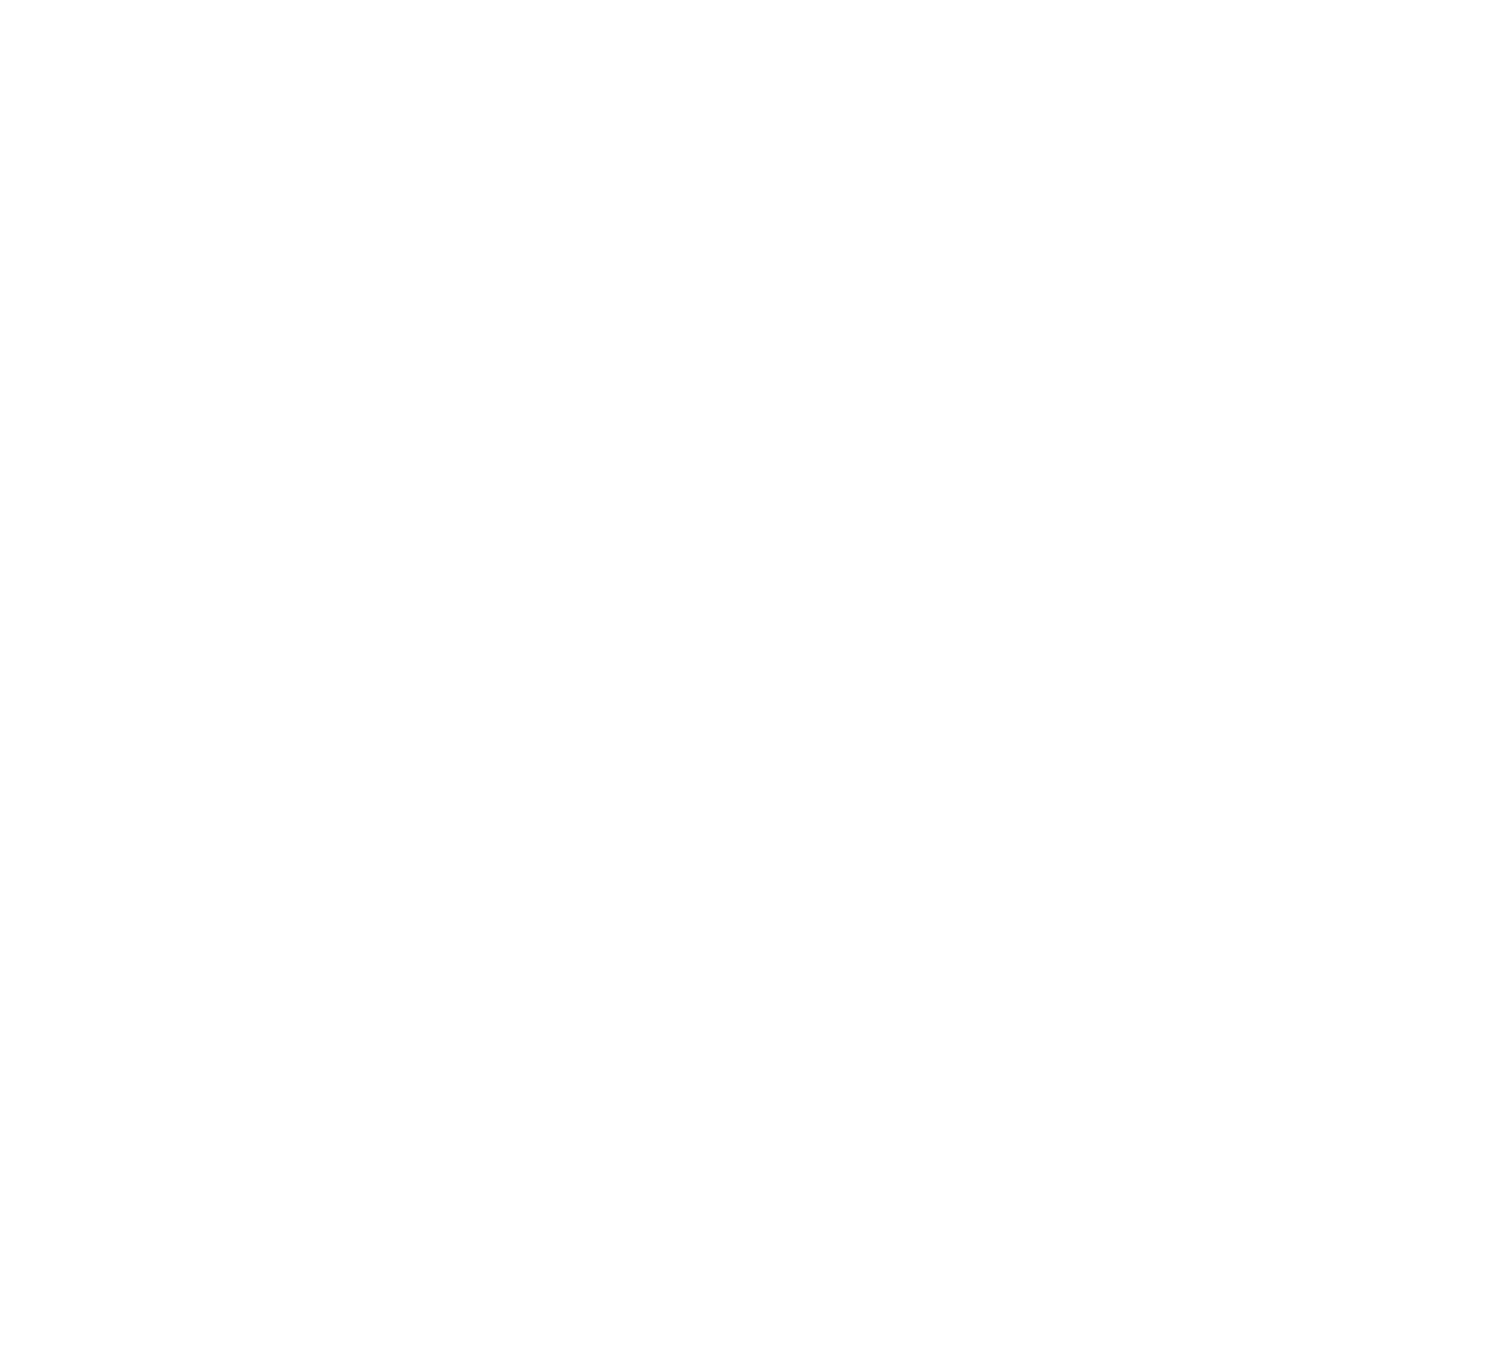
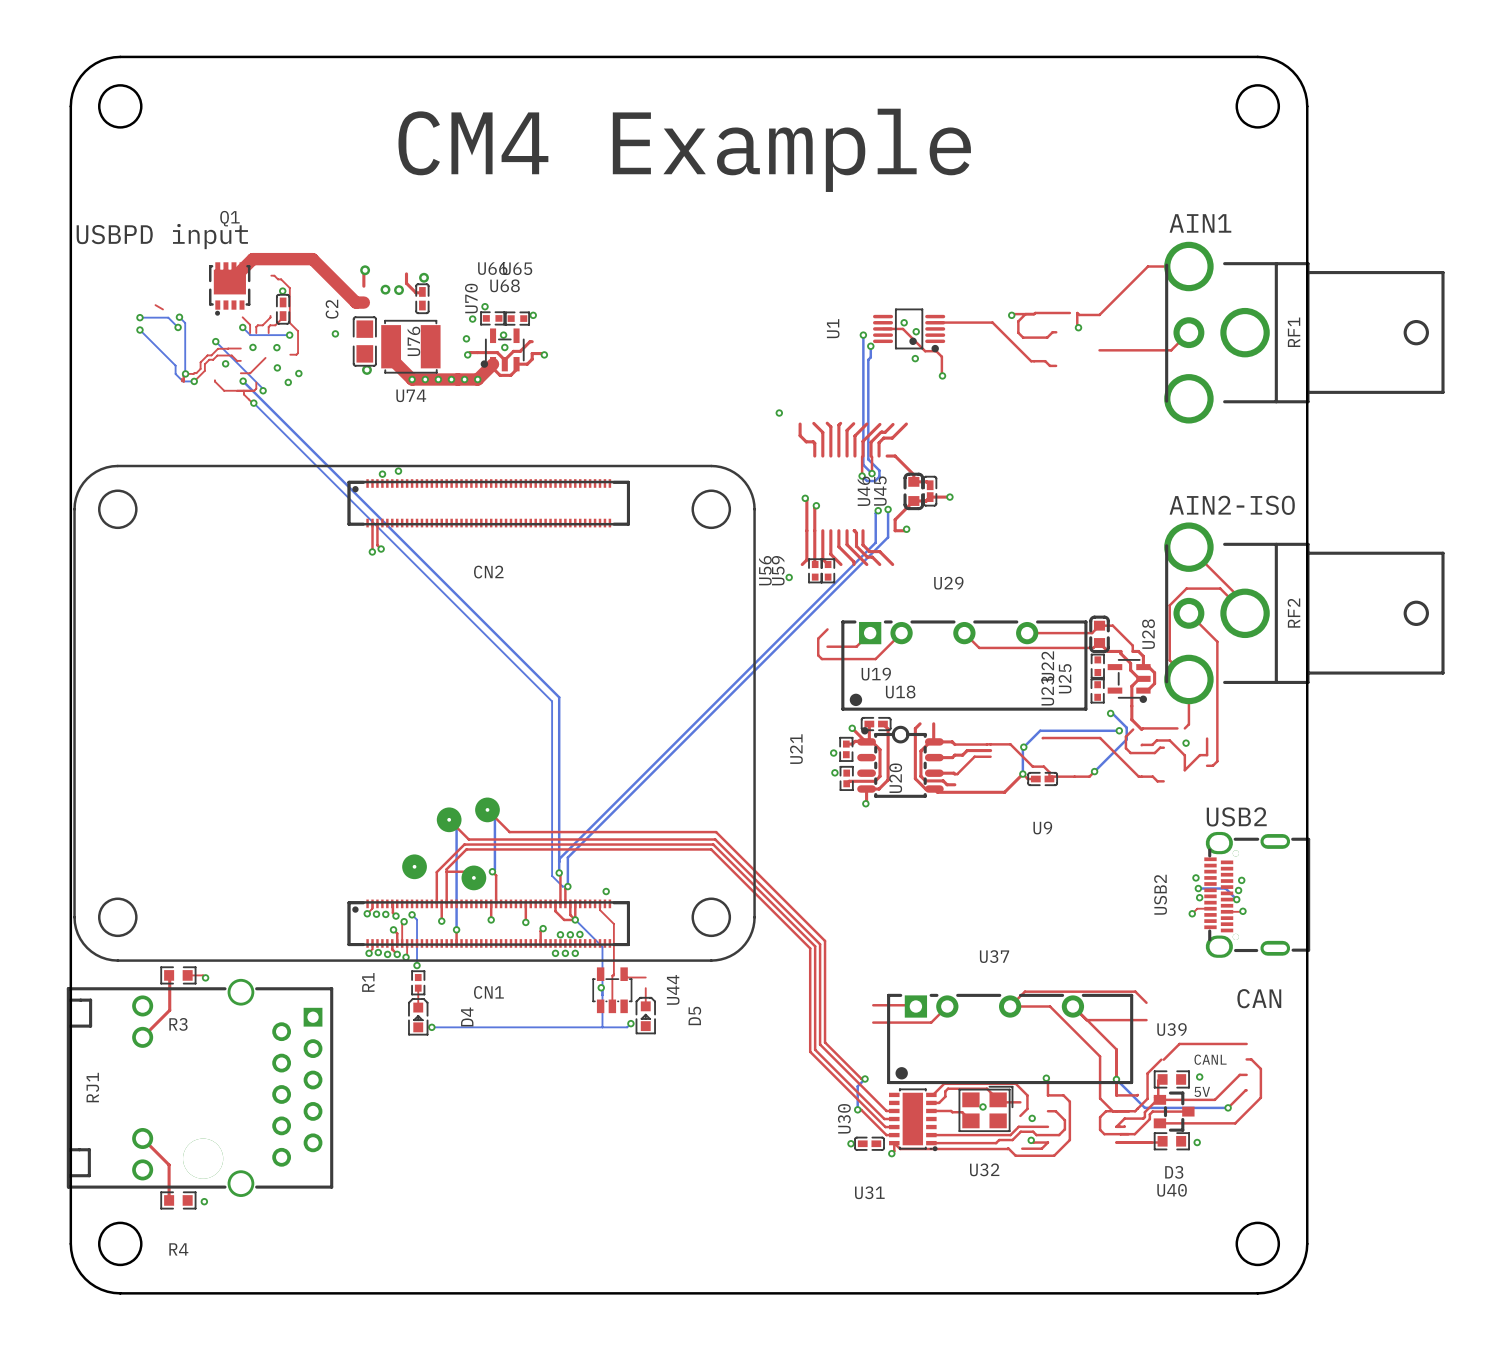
board edge: none -> (120, 56) (1257, 56) (1276, 60) (1292, 71) (1303, 87) (1307, 106) (1307, 1243) (1303, 1262) (1292, 1278) (1276, 1289) (1257, 1293) (120, 1293) (101, 1289) (85, 1278) (74, 1262) (70, 1243) (70, 106) (74, 87) (85, 71) (101, 60) (120, 56)
round board edge: none -> [98, 84, 143, 129]
round board edge: none -> [1235, 84, 1281, 129]
text: none -> CM4 Example (684, 150)
text: none -> AIN1 (1200, 223)
text: none -> USBPD input (162, 236)
top track: none -> (1188, 266) (1147, 266) (1099, 314) (1079, 314) (1077, 312) (1078, 327)
top track: none -> (365, 270) (363, 286)
via: none -> (365, 270)
top track: none -> (406, 273) (406, 283) (415, 292) (422, 292)
top track: none -> (271, 275) (281, 279) (289, 288) (289, 322) (298, 331) (298, 353) (290, 354)
via: none -> (424, 277)
top track: none -> (229, 282) (252, 259) (312, 259) (356, 302) (363, 302)
Q1: none -> (229, 288)
via: none -> (385, 289)
via: none -> (399, 290)
via: none -> (282, 291)
U70: none -> (422, 298)
top track: none -> (155, 305) (162, 309)
via: none -> (485, 306)
C2: none -> (283, 309)
top track: none -> (1069, 312) (1011, 315)
top track: none -> (1025, 314) (1018, 321) (1018, 332) (1023, 337) (1047, 337) (1052, 332) (1056, 332)
top track: none -> (270, 315) (262, 325) (256, 326) (256, 333)
via: none -> (533, 315)
via: none -> (1011, 315)
top track: none -> (283, 316) (275, 325) (268, 326) (268, 333)
bottom track: none -> (139, 317) (168, 317) (178, 327)
via: none -> (139, 317)
bottom track: none -> (179, 317) (185, 322) (185, 373)
via: none -> (179, 317)
top track: none -> (242, 317) (250, 324) (250, 333)
U66: none -> (492, 318)
U65: none -> (517, 318)
via: none -> (472, 319)
via: none -> (904, 322)
top track: none -> (935, 322) (992, 322) (1031, 361) (1045, 361) (1049, 365) (1056, 365)
via: none -> (178, 327)
bottom track: none -> (242, 327) (250, 335) (289, 335)
via: none -> (242, 327)
via: none -> (1078, 327)
top track: none -> (883, 328) (902, 328) (925, 351) (936, 351) (941, 356) (942, 375)
bottom track: none -> (139, 330) (175, 365) (175, 374) (183, 381) (194, 381)
via: none -> (139, 330)
U1: none -> (909, 330)
via: none -> (916, 331)
top track: none -> (1188, 332) (1171, 350) (1099, 350)
RF1: none -> (1304, 332)
via: none -> (335, 333)
via: none -> (289, 335)
via: none -> (503, 335)
bottom track: none -> (863, 335) (863, 464) (872, 473)
via: none -> (863, 335)
via: none -> (466, 338)
bottom track: none -> (215, 341) (263, 390)
via: none -> (215, 341)
U76: none -> (364, 341)
top track: none -> (532, 341) (520, 351) (513, 351) (504, 360) (497, 352) (470, 352) (467, 354)
U74: none -> (410, 346)
bottom track: none -> (870, 346) (870, 357) (868, 359) (868, 459) (879, 470) (879, 476) (875, 481) (867, 481) (862, 476)
via: none -> (870, 346)
via: none -> (252, 347)
via: none -> (276, 347)
via: none -> (504, 347)
top track: none -> (240, 348) (218, 348) (200, 362) (200, 368) (196, 373) (185, 373) (183, 381)
top track: none -> (393, 349) (393, 360) (412, 379) (477, 379) (493, 364) (493, 368) (500, 375) (510, 375) (516, 369) (516, 364) (527, 364) (532, 359) (532, 353) (544, 354)
U68: none -> (502, 349)
via: none -> (467, 354)
via: none -> (544, 354)
top track: none -> (265, 357) (250, 373) (240, 373)
via: none -> (915, 358)
top track: none -> (240, 360) (237, 360) (231, 355) (217, 355) (204, 364) (204, 370) (194, 381)
via: none -> (225, 363)
via: none -> (277, 367)
via: none -> (366, 369)
via: none -> (185, 373)
via: none -> (298, 373)
via: none -> (942, 375)
top track: none -> (181, 378) (181, 381)
via: none -> (412, 379)
via: none -> (425, 379)
via: none -> (438, 379)
via: none -> (451, 379)
via: none -> (464, 379)
via: none -> (477, 379)
top track: none -> (214, 380) (224, 390) (254, 390) (256, 382)
via: none -> (194, 381)
bottom track: none -> (243, 381) (559, 697) (559, 872)
via: none -> (243, 381)
via: none -> (288, 382)
top track: none -> (243, 390) (243, 394) (253, 403)
via: none -> (263, 390)
bottom track: none -> (253, 403) (552, 701) (552, 875) (562, 886) (567, 886) (567, 857) (888, 537) (888, 509)
via: none -> (253, 403)
via: none -> (779, 413)
top track: none -> (813, 423) (822, 432) (822, 456)
top track: none -> (827, 423) (830, 426) (830, 456)
top track: none -> (840, 423) (838, 425) (838, 456)
top track: none -> (853, 423) (847, 430) (847, 456)
top track: none -> (800, 424) (800, 435) (806, 441) (814, 443) (814, 456)
top track: none -> (866, 424) (854, 435) (854, 456)
top track: none -> (879, 424) (862, 441) (862, 476)
top track: none -> (893, 424) (885, 432) (881, 431)
top track: none -> (906, 424) (892, 438) (883, 438) (879, 442) (879, 456)
top track: none -> (880, 432) (871, 442) (872, 473)
top track: none -> (887, 456) (895, 456) (913, 474) (913, 481) (926, 481) (930, 485)
line: none -> (117, 466) (711, 466) (725, 468) (738, 475) (750, 490) (754, 509) (754, 917) (752, 931) (745, 944) (730, 956) (711, 960) (117, 960) (106, 959) (91, 951) (80, 938) (74, 917) (74, 509) (77, 492) (87, 478) (101, 469) (117, 466)
via: none -> (398, 471)
via: none -> (872, 473)
via: none -> (382, 474)
via: none -> (862, 476)
line: none -> (349, 482) (349, 524) (628, 524) (628, 482) (349, 482)
drawing: none -> [98, 489, 138, 530]
drawing: none -> [691, 489, 732, 530]
U46: none -> (913, 491)
U45: none -> (930, 491)
top track: none -> (949, 497) (930, 497) (926, 501) (913, 501) (895, 519) (895, 530) (906, 529)
via: none -> (949, 497)
top track: none -> (805, 498) (806, 499) (806, 559) (802, 564)
via: none -> (805, 498)
CN2: none -> (488, 503)
top track: none -> (816, 505) (814, 507) (815, 564)
via: none -> (816, 505)
text: none -> AIN2-ISO (1232, 505)
via: none -> (888, 509)
bottom track: none -> (878, 510) (875, 513) (875, 542) (559, 859)
via: none -> (878, 510)
top track: none -> (372, 523) (372, 551)
top track: none -> (377, 523) (377, 545) (381, 549)
via: none -> (906, 529)
top track: none -> (822, 530) (822, 559) (828, 564)
top track: none -> (830, 530) (830, 554) (841, 564)
top track: none -> (838, 530) (838, 546) (853, 561) (853, 564)
top track: none -> (847, 530) (847, 544) (866, 564)
top track: none -> (854, 530) (856, 546) (867, 557) (872, 557) (879, 564)
top track: none -> (862, 530) (862, 544) (869, 551) (879, 551) (892, 564)
top track: none -> (1188, 547) (1245, 603) (1245, 613) (1220, 588) (1186, 588) (1169, 605) (1169, 660) (1188, 679) (1188, 724) (1184, 728)
via: none -> (381, 549)
via: none -> (372, 551)
U56: none -> (815, 570)
U59: none -> (828, 570)
via: none -> (789, 577)
top track: none -> (1188, 613) (1217, 641) (1217, 761) (1212, 765) (1207, 765)
RF2: none -> (1304, 613)
top track: none -> (827, 629) (818, 638) (818, 655) (821, 659) (875, 659) (901, 633)
top track: none -> (870, 633) (856, 646) (827, 646)
top track: none -> (964, 633) (979, 647) (1093, 647) (1099, 642) (1107, 651) (1120, 651) (1130, 663) (1130, 670) (1139, 678)
top track: none -> (1027, 633) (1092, 633) (1099, 625) (1112, 625) (1132, 645) (1132, 651) (1138, 651) (1143, 656) (1143, 667) (1148, 667) (1154, 672) (1154, 683) (1147, 690) (1143, 690)
U28: none -> (1099, 634)
U29: none -> (964, 665)
U22: none -> (1097, 666)
top track: none -> (1139, 678) (1131, 686) (1131, 719) (1141, 729) (1177, 728)
U25: none -> (1129, 680)
U23: none -> (1097, 691)
bottom track: none -> (1110, 713) (1126, 727) (1126, 739) (1094, 771)
via: none -> (1110, 713)
top track: none -> (920, 723) (915, 728) (915, 778) (925, 789) (934, 789) (937, 792) (1004, 792) (1022, 774) (1027, 779) (1035, 779)
top track: none -> (933, 723) (934, 741)
top track: none -> (869, 724) (869, 739) (866, 741) (855, 741) (852, 744) (846, 744)
U19: none -> (876, 724)
top track: none -> (882, 724) (888, 729) (888, 779) (879, 789) (866, 789) (865, 803)
top track: none -> (852, 728) (865, 741) (872, 741) (879, 749) (879, 776) (875, 781) (849, 781) (846, 783)
via: none -> (852, 728)
top track: none -> (1133, 729) (1125, 736) (1125, 748) (1130, 753) (1154, 753) (1160, 747) (1163, 747)
bottom track: none -> (1119, 730) (1040, 730) (1022, 748) (1022, 774)
via: none -> (1119, 730)
top track: none -> (1042, 738) (1100, 738) (1138, 776) (1152, 776) (1157, 781) (1163, 781)
top track: none -> (1207, 738) (1207, 755) (1199, 755) (1184, 770) (1184, 755) (1169, 740) (1156, 740) (1152, 744) (1141, 745)
via: none -> (1186, 743)
top track: none -> (986, 744) (930, 741) (920, 751) (920, 776) (925, 780) (943, 780) (947, 784) (954, 784)
top track: none -> (987, 744) (1010, 744) (1032, 766) (1043, 766) (1049, 772) (1049, 779) (1051, 776) (1089, 776) (1094, 771)
via: none -> (1023, 747)
U21: none -> (846, 749)
top track: none -> (990, 750) (967, 750) (962, 755) (954, 755) (952, 757) (934, 757)
via: none -> (833, 753)
top track: none -> (990, 756) (974, 756) (957, 774) (934, 773)
U18: none -> (900, 761)
via: none -> (1094, 771)
via: none -> (834, 772)
via: none -> (1022, 774)
U20: none -> (846, 778)
U9: none -> (1042, 779)
via: none -> (865, 803)
bottom track: none -> (487, 809) (494, 817) (494, 869) (492, 871)
top track: none -> (487, 809) (509, 832) (716, 832) (825, 940) (825, 1042) (861, 1079) (865, 1079)
via: none -> (487, 809)
text: none -> USB2 (1236, 816)
bottom track: none -> (449, 819) (456, 827) (456, 929)
top track: none -> (449, 819) (468, 839) (715, 839) (820, 944) (820, 1044) (886, 1110) (894, 1110)
via: none -> (449, 819)
via: none -> (414, 866)
top track: none -> (446, 871) (467, 871) (473, 877)
top track: none -> (492, 871) (496, 875) (496, 903)
via: none -> (492, 871)
top track: none -> (559, 872) (560, 903)
via: none -> (559, 872)
via: none -> (473, 877)
via: none -> (1195, 877)
via: none -> (1241, 880)
top track: none -> (567, 886) (565, 889) (565, 903)
via: none -> (567, 886)
bottom track: none -> (1198, 888) (1225, 888) (1236, 899)
via: none -> (1198, 888)
via: none -> (1238, 890)
via: none -> (606, 891)
USB2: none -> (1257, 894)
drawing: none -> [98, 897, 138, 938]
drawing: none -> [691, 897, 732, 938]
via: none -> (1199, 897)
via: none -> (1236, 899)
line: none -> (349, 902) (628, 902) (628, 944) (349, 944) (349, 902)
top track: none -> (372, 903) (372, 908) (367, 913)
top track: none -> (392, 903) (392, 912) (395, 916)
top track: none -> (436, 903) (436, 872) (464, 844) (713, 844) (815, 946) (815, 1049) (884, 1119) (894, 1119)
top track: none -> (441, 903) (441, 921)
top track: none -> (446, 903) (446, 869) (466, 849) (711, 849) (810, 948) (810, 1051) (885, 1127) (894, 1127)
top track: none -> (491, 903) (491, 919)
top track: none -> (525, 903) (525, 922)
top track: none -> (555, 903) (555, 911) (564, 919) (575, 919)
top track: none -> (570, 903) (570, 915) (575, 919)
top track: none -> (575, 903) (575, 919)
top track: none -> (600, 903) (600, 910) (613, 923) (613, 975)
top track: none -> (1210, 908) (1197, 908) (1192, 913)
top track: none -> (1242, 911) (1227, 911)
via: none -> (1242, 911)
via: none -> (367, 913)
via: none -> (1192, 913)
via: none -> (376, 914)
via: none -> (385, 914)
bottom track: none -> (412, 914) (417, 919) (417, 965)
via: none -> (412, 914)
via: none -> (395, 916)
via: none -> (491, 919)
bottom track: none -> (575, 919) (602, 946) (602, 1027)
via: none -> (575, 919)
top track: none -> (404, 921) (402, 923) (402, 943)
via: none -> (404, 921)
via: none -> (441, 921)
via: none -> (525, 922)
CN1: none -> (488, 923)
top track: none -> (543, 928) (540, 931) (540, 943)
via: none -> (543, 928)
top track: none -> (393, 929) (397, 933) (397, 943)
via: none -> (393, 929)
top track: none -> (456, 929) (456, 943)
via: none -> (456, 929)
via: none -> (560, 934)
via: none -> (570, 934)
via: none -> (579, 934)
top track: none -> (372, 943) (372, 949) (369, 953)
top track: none -> (392, 943) (392, 949) (397, 954)
top track: none -> (407, 943) (406, 957)
via: none -> (378, 952)
via: none -> (369, 953)
via: none -> (555, 953)
via: none -> (565, 953)
via: none -> (575, 953)
via: none -> (387, 954)
via: none -> (397, 954)
via: none -> (406, 957)
via: none -> (417, 965)
top track: none -> (613, 974) (612, 1006)
top track: none -> (624, 974) (627, 977) (645, 977)
top track: none -> (169, 975) (169, 1010) (142, 1037)
R3: none -> (178, 975)
top track: none -> (187, 975) (203, 975) (205, 977)
via: none -> (205, 977)
R1: none -> (418, 982)
via: none -> (601, 987)
top track: none -> (418, 988) (418, 1007)
top track: none -> (645, 988) (645, 1006)
U44: none -> (612, 990)
text: none -> CAN (1259, 998)
top track: none -> (1146, 1002) (1135, 991) (1024, 991) (1010, 1006)
top track: none -> (873, 1005) (915, 1006)
top track: none -> (947, 1006) (931, 1022) (873, 1022)
top track: none -> (1013, 1006) (1050, 1006) (1100, 1056) (1100, 1098) (1112, 1111)
top track: none -> (1072, 1006) (1086, 1020) (1146, 1020)
top track: none -> (1076, 1006) (1076, 1009) (1116, 1049) (1116, 1095) (1137, 1094)
D5: none -> (645, 1015)
D4: none -> (418, 1016)
bottom track: none -> (630, 1023) (627, 1027) (431, 1027)
via: none -> (630, 1023)
via: none -> (431, 1027)
U37: none -> (1010, 1038)
top track: none -> (1246, 1043) (1179, 1043) (1163, 1059)
top track: none -> (1161, 1059) (1147, 1073) (1147, 1098) (1135, 1111) (1106, 1111) (1100, 1117) (1100, 1129) (1104, 1134) (1134, 1134) (1149, 1119) (1149, 1114) (1152, 1111) (1188, 1111)
text: none -> CANL (1210, 1059)
top track: none -> (1246, 1059) (1251, 1059) (1260, 1068) (1260, 1097) (1235, 1123) (1159, 1123)
top track: none -> (1246, 1074) (1239, 1074) (1214, 1099) (1159, 1099)
via: none -> (1199, 1076)
top track: none -> (1046, 1078) (1047, 1095) (1063, 1095) (1069, 1101) (1069, 1140) (1054, 1155) (1015, 1155) (1008, 1148) (900, 1149) (894, 1143) (894, 1151) (891, 1153)
via: none -> (1046, 1078)
bottom track: none -> (865, 1079) (857, 1086) (857, 1109)
via: none -> (865, 1079)
bottom track: none -> (1116, 1079) (1144, 1107) (1228, 1107)
via: none -> (1116, 1079)
top track: none -> (1159, 1079) (1158, 1097)
U39: none -> (1171, 1079)
RJ1: none -> (200, 1087)
top track: none -> (1246, 1090) (1228, 1107)
text: none -> 5V (1202, 1091)
top track: none -> (933, 1094) (944, 1083) (1015, 1083) (1027, 1095) (1027, 1108) (1020, 1115)
top track: none -> (1154, 1097) (1157, 1097) (1157, 1099) (1144, 1112) (1143, 1118) (1124, 1118) (1116, 1126) (1124, 1126)
top track: none -> (1020, 1102) (1000, 1102) (987, 1088) (948, 1088) (945, 1091) (945, 1096) (939, 1102) (931, 1102)
via: none -> (982, 1106)
via: none -> (1228, 1107)
U32: none -> (985, 1108)
top track: none -> (857, 1109) (861, 1109) (886, 1135) (894, 1135)
via: none -> (857, 1109)
top track: none -> (931, 1110) (962, 1112) (970, 1120)
top track: none -> (1047, 1111) (1055, 1111) (1064, 1120) (1064, 1129) (1059, 1135) (1036, 1135) (1033, 1131) (1020, 1131) (1012, 1140) (999, 1140) (996, 1143) (931, 1143)
D3: none -> (1174, 1111)
via: none -> (1032, 1118)
U30: none -> (913, 1119)
top track: none -> (1047, 1126) (1018, 1126) (1010, 1135) (931, 1135)
top track: none -> (142, 1138) (169, 1164) (169, 1200)
top track: none -> (1031, 1140) (1033, 1142) (1047, 1142) (1041, 1148) (1022, 1148)
via: none -> (1031, 1140)
top track: none -> (1162, 1141) (1116, 1142)
U40: none -> (1171, 1141)
via: none -> (1197, 1142)
via: none -> (851, 1143)
U31: none -> (869, 1143)
via: none -> (891, 1153)
R4: none -> (178, 1200)
via: none -> (204, 1201)
round board edge: none -> [98, 1221, 143, 1267]
round board edge: none -> [1235, 1221, 1281, 1267]

